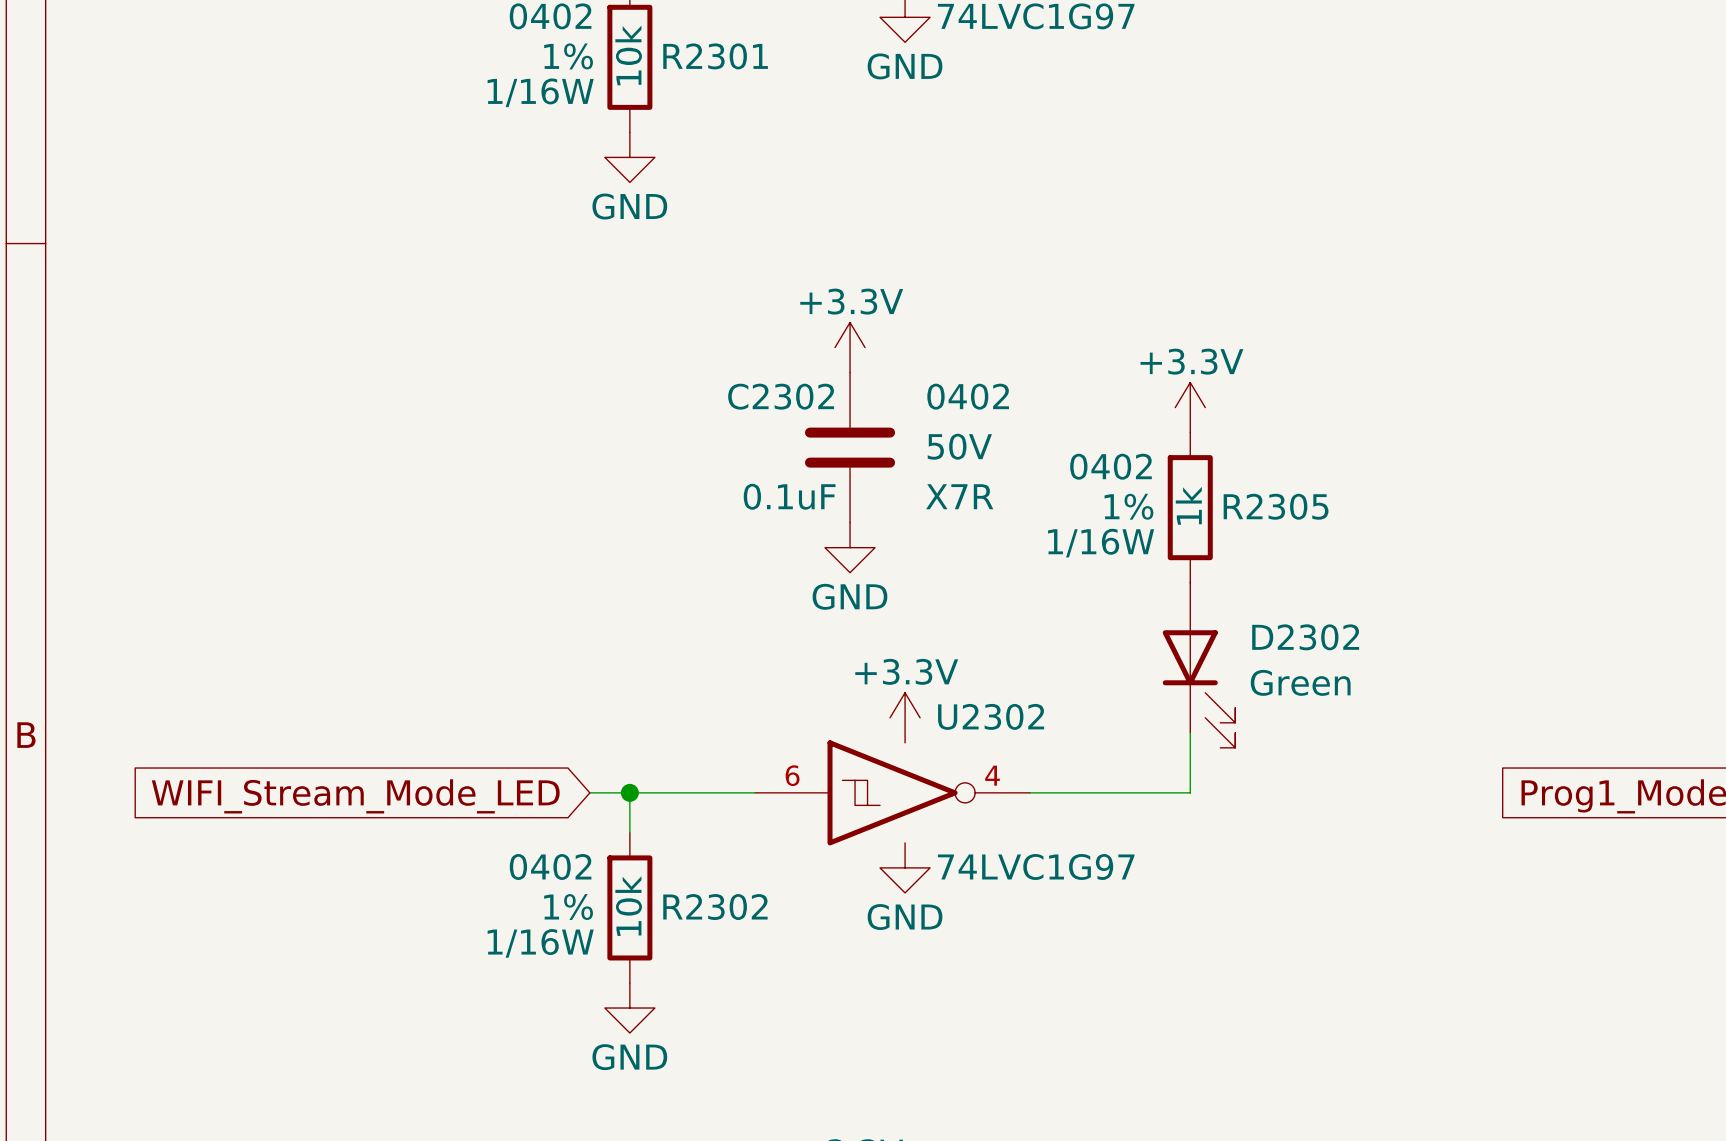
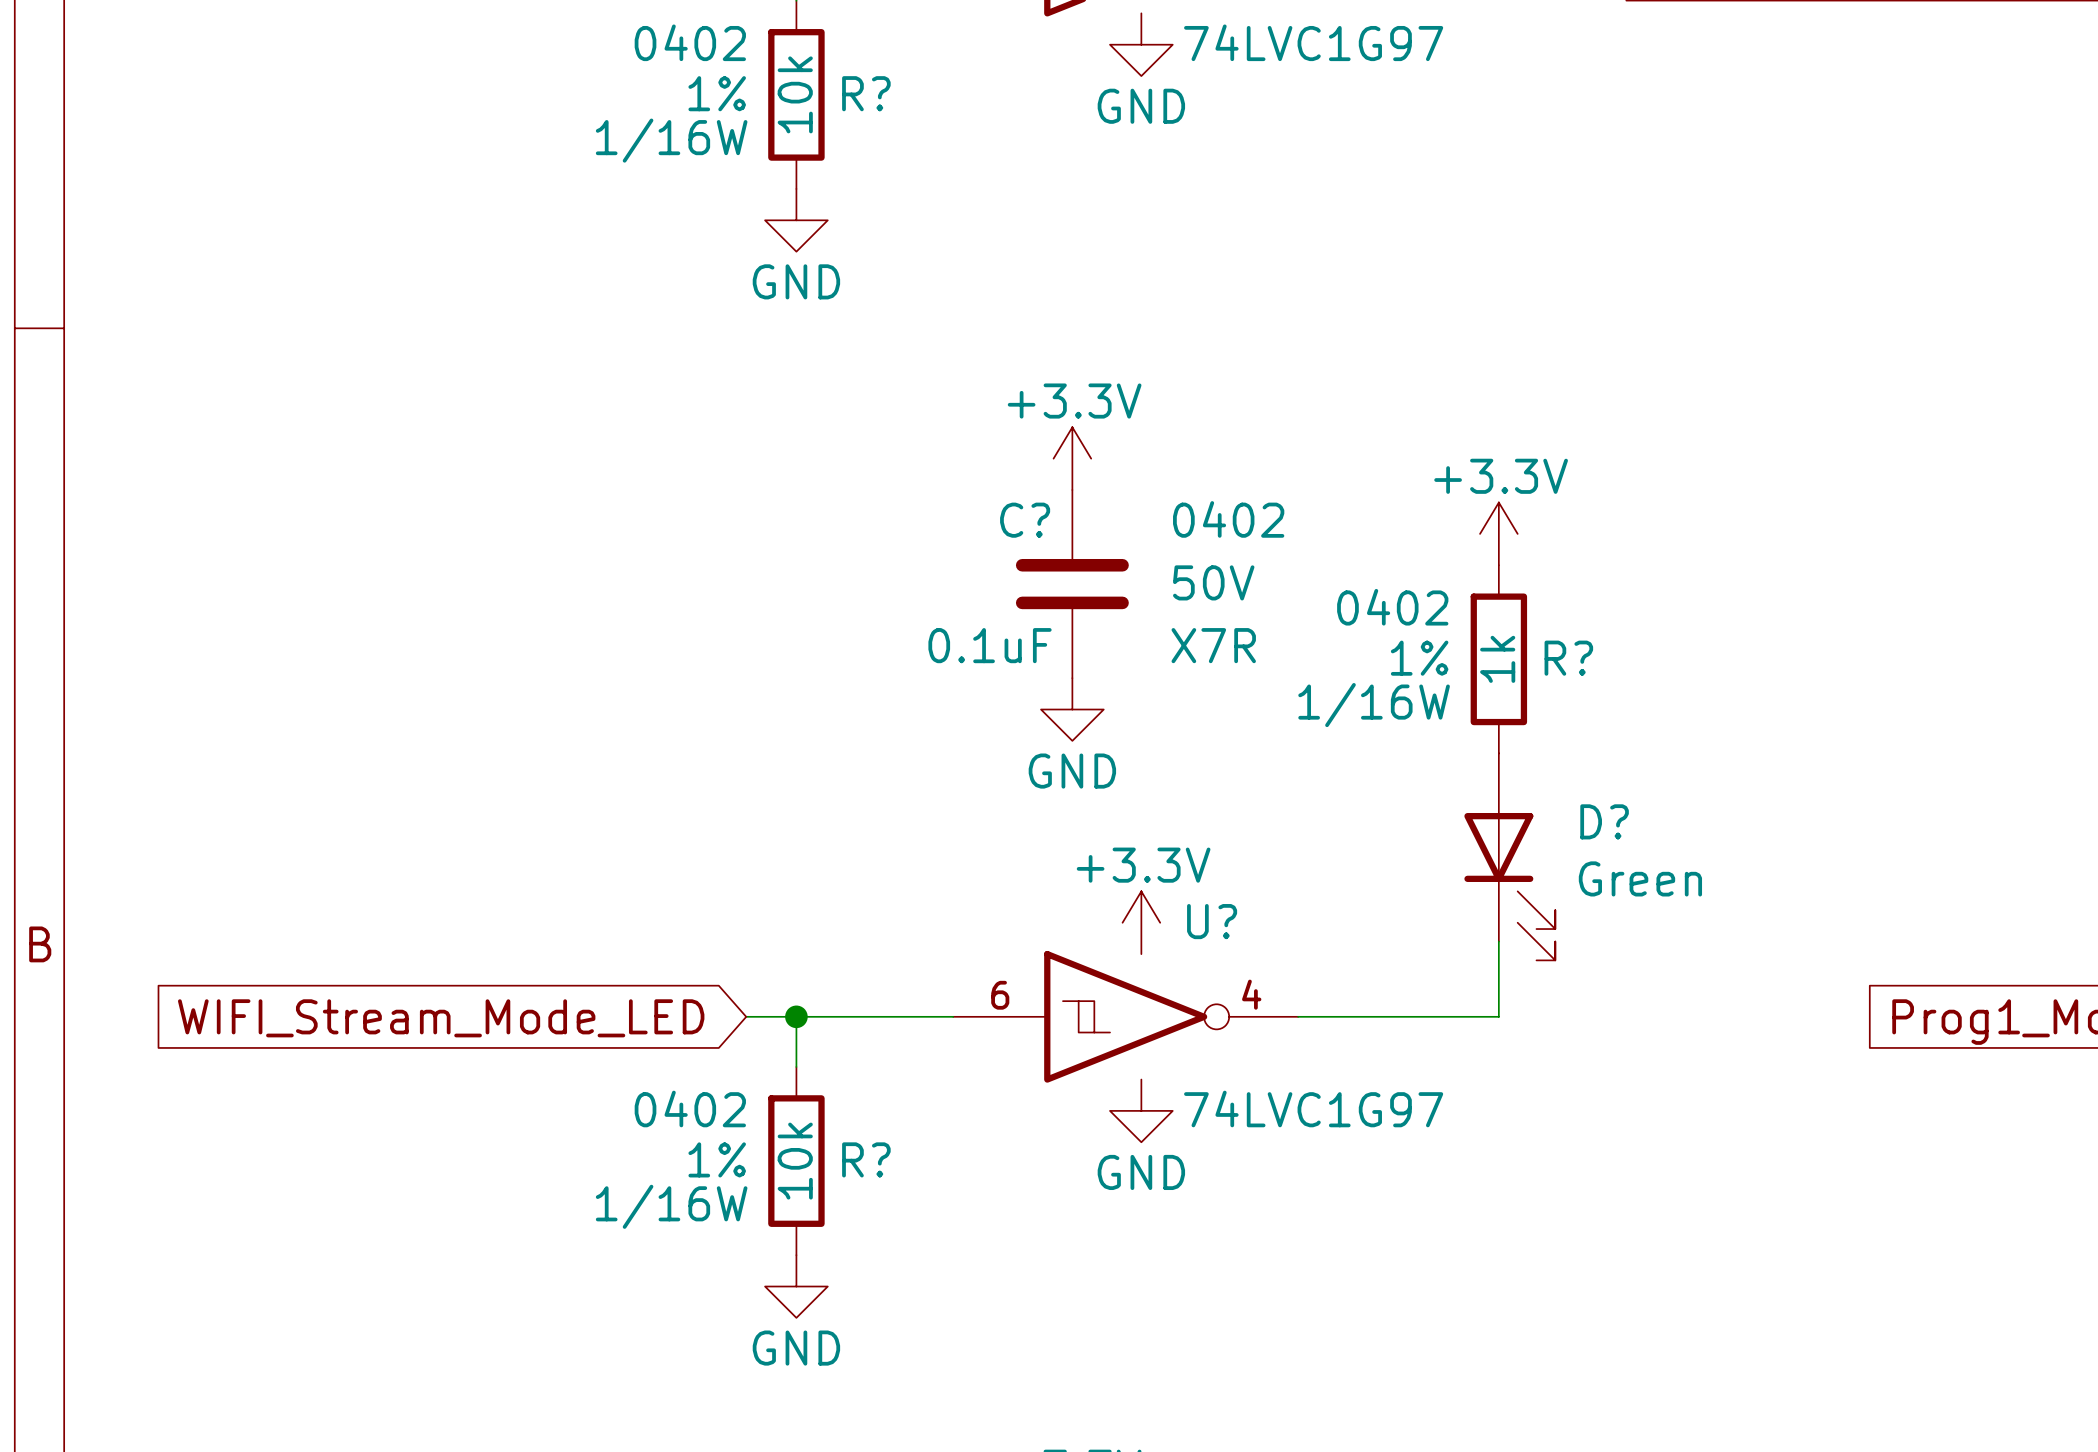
R2301 name: R2301 (715, 56) -> R? (866, 93)
C2302 name: C2302 (781, 396) -> C? (1025, 520)
R2305 name: R2305 (1276, 506) -> R? (1568, 658)
D2302 name: D2302 (1305, 637) -> D? (1604, 821)
U2302 name: U2302 (991, 716) -> U? (1212, 921)
R2302 name: R2302 (715, 907) -> R? (866, 1159)

